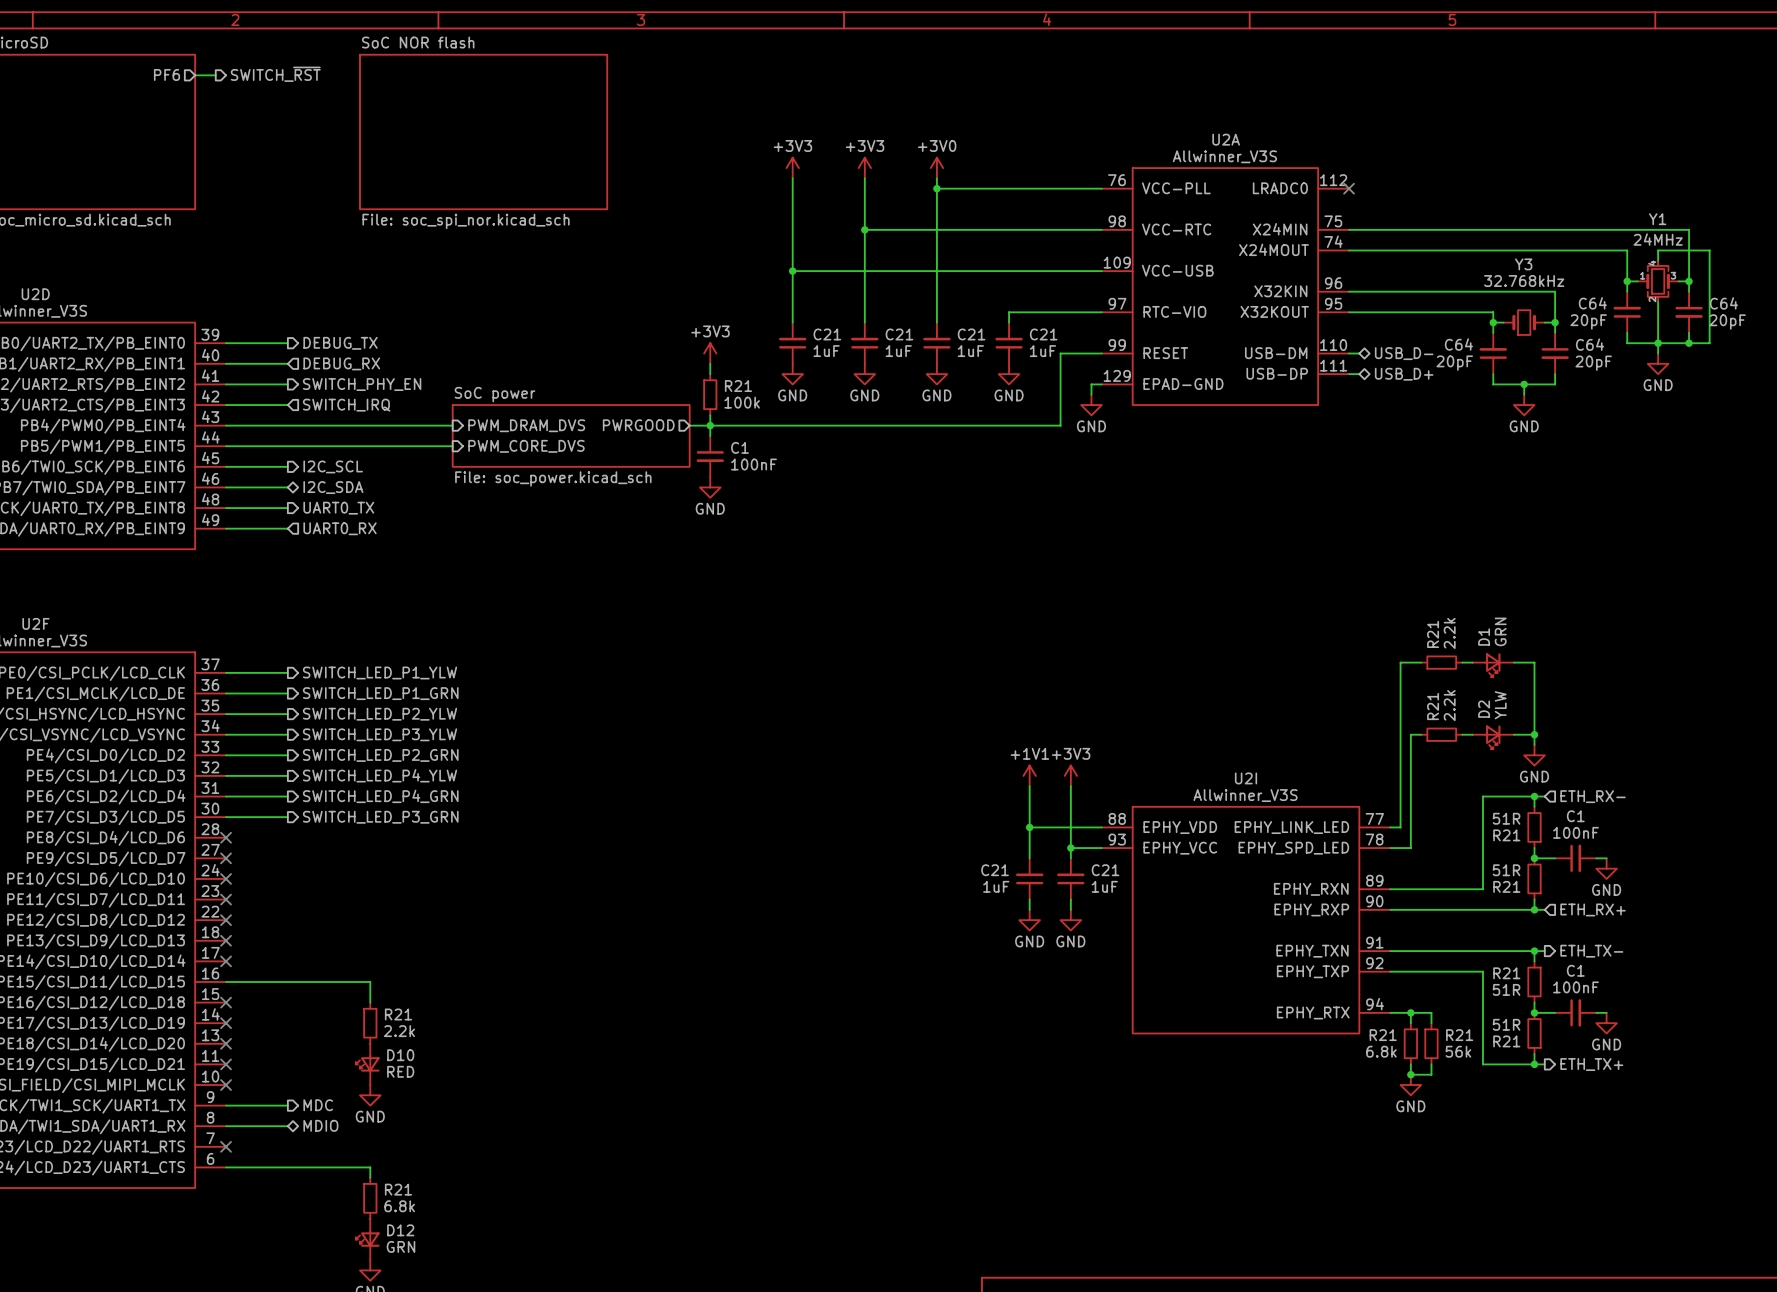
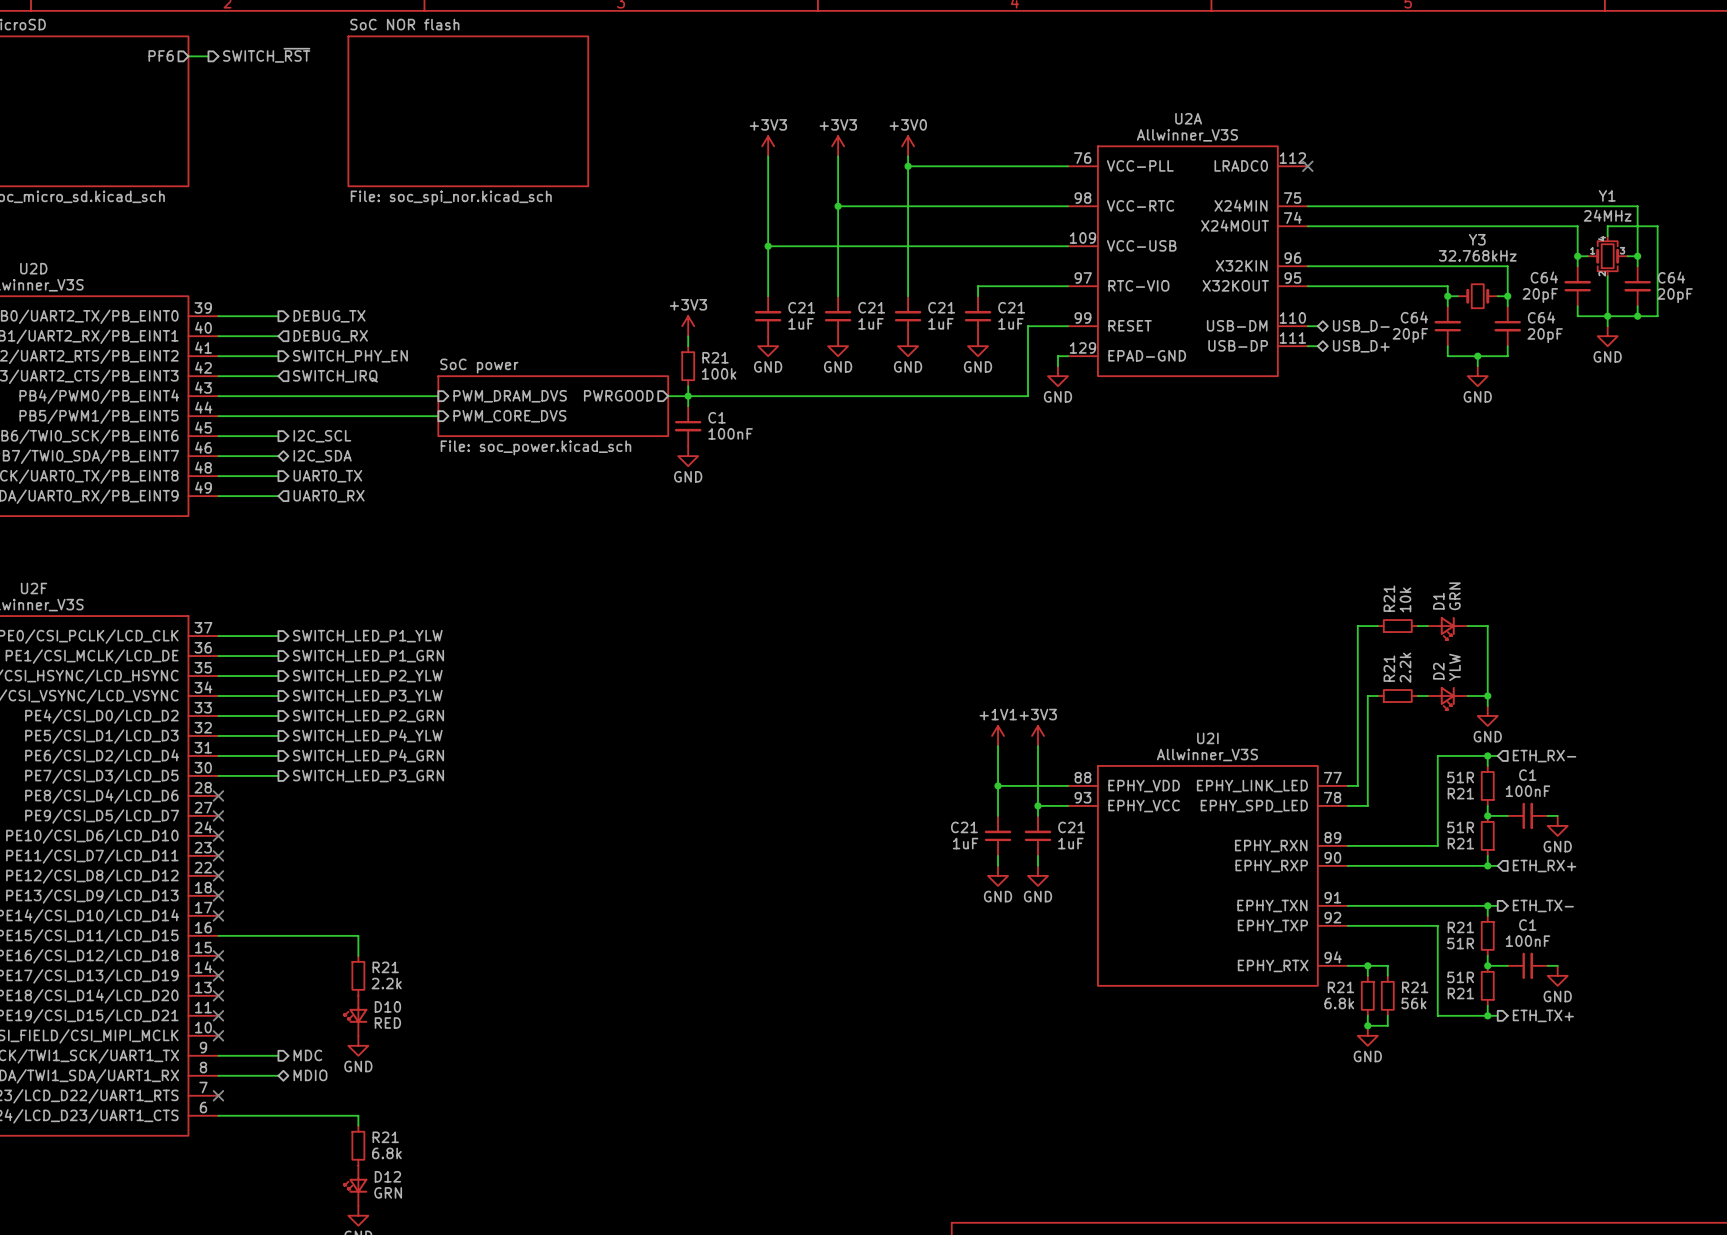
R21 value: 2.2k (1449, 633) -> 10k (1405, 599)

